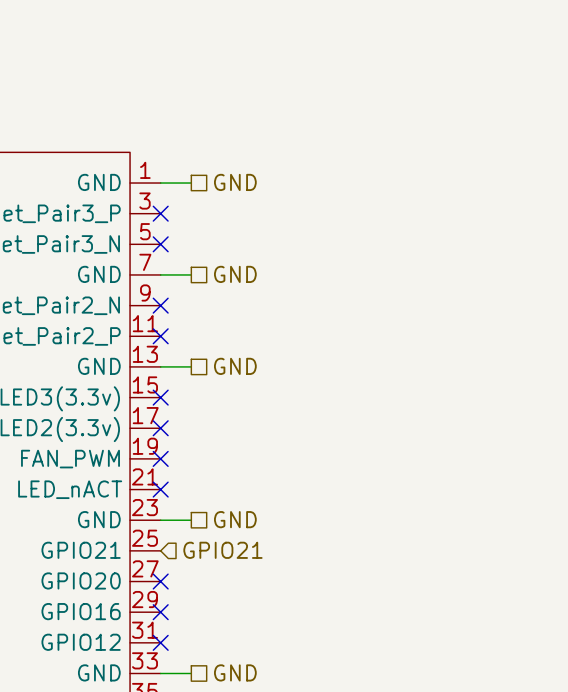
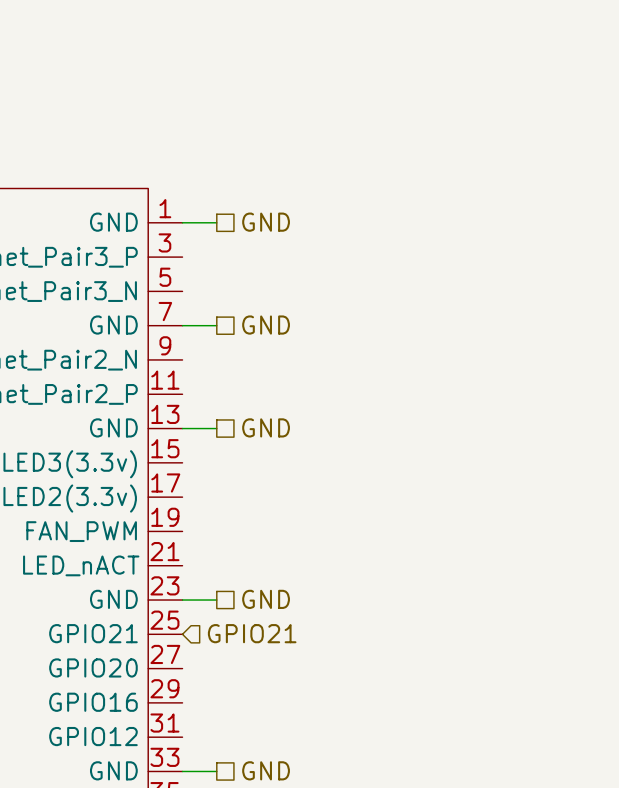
no-connect mark: (160, 213) -> none
no-connect mark: (160, 244) -> none
no-connect mark: (160, 305) -> none
no-connect mark: (160, 336) -> none
no-connect mark: (160, 397) -> none
no-connect mark: (160, 428) -> none
no-connect mark: (160, 458) -> none
no-connect mark: (160, 489) -> none
no-connect mark: (160, 581) -> none
no-connect mark: (160, 612) -> none
no-connect mark: (160, 642) -> none

